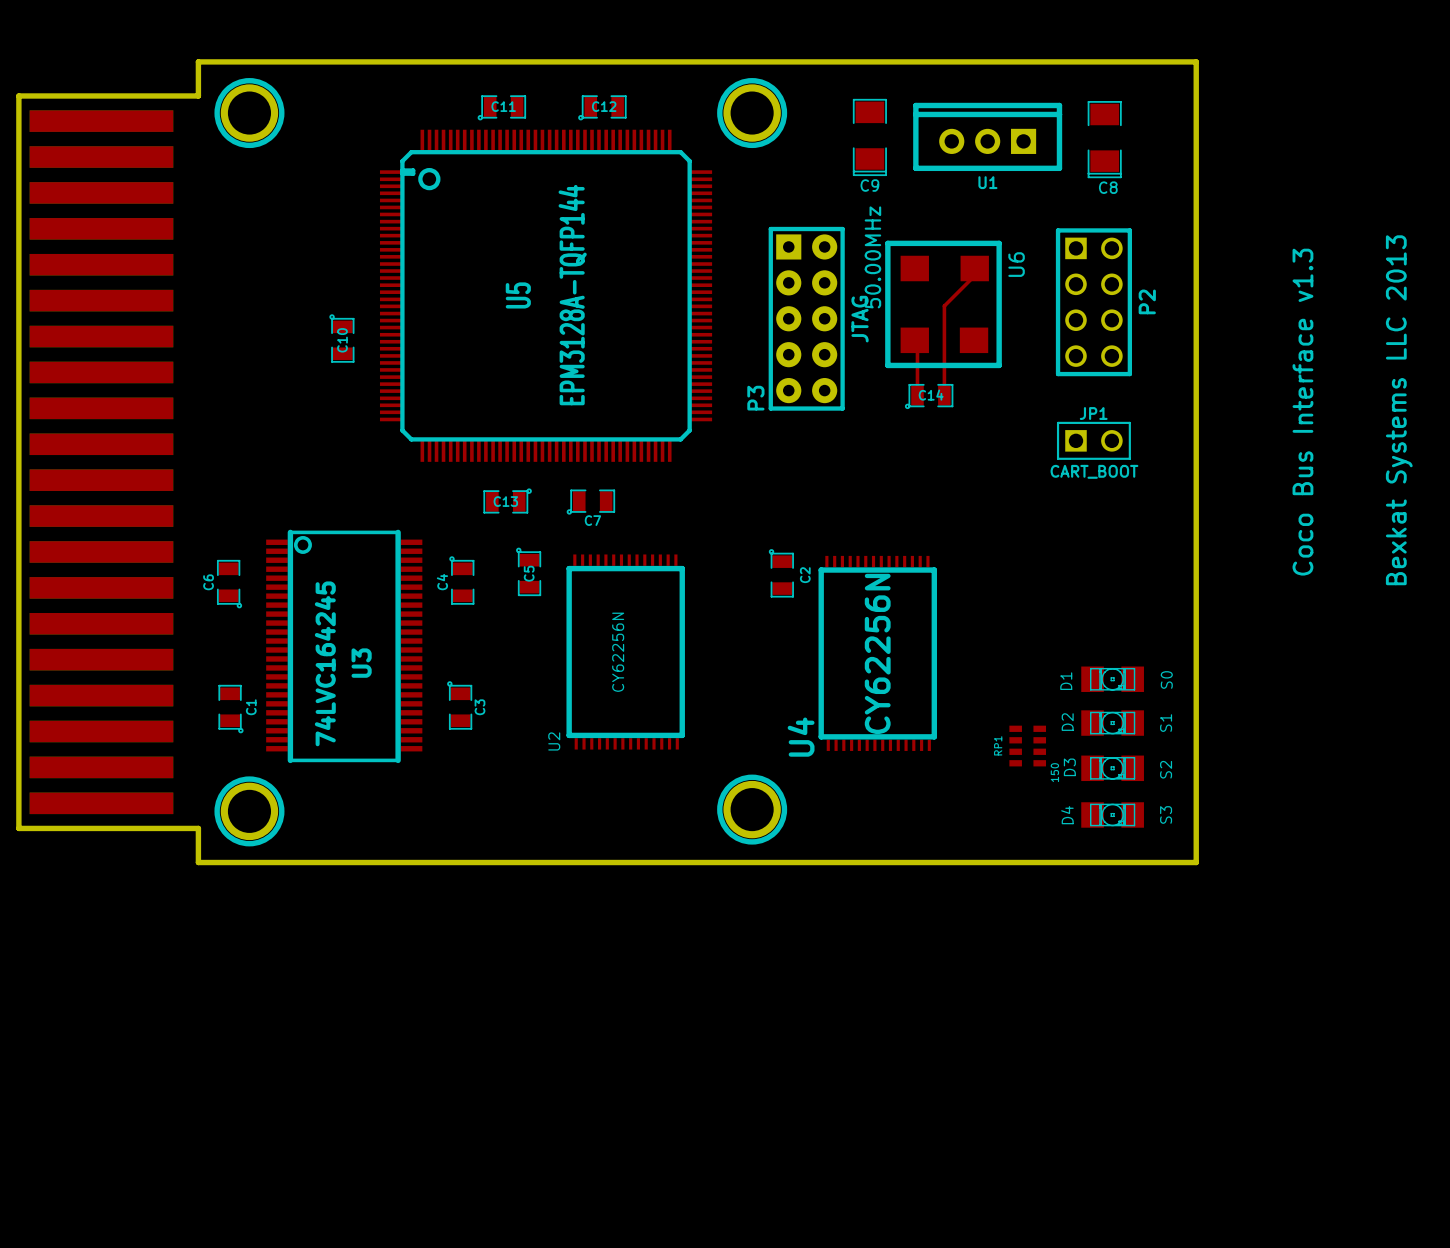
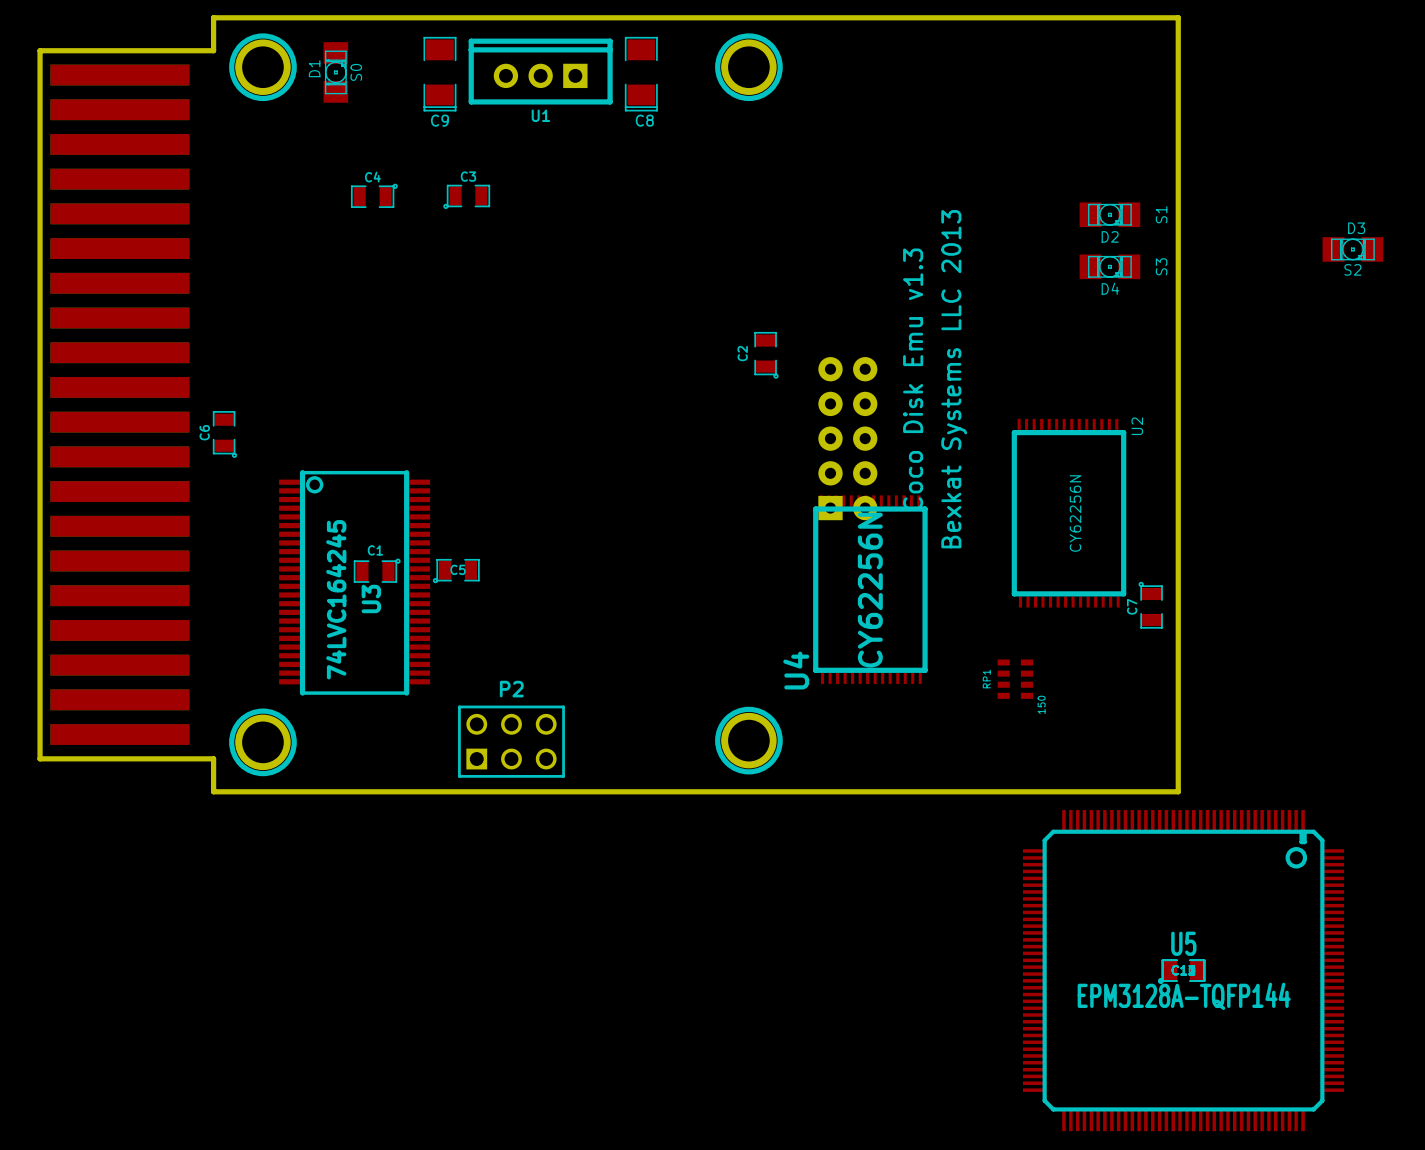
C11 position: (501, 107) -> (1181, 971)
C12 position: (602, 107) -> (1181, 971)
U1 position: (987, 136) -> (540, 71)
C9 position: (869, 137) -> (439, 74)
C8 position: (1104, 139) -> (641, 74)
P2 footprint: [1055, 228, 1133, 377] -> [458, 705, 565, 778]
top track: (974, 268) (974, 275) (944, 306) (944, 395) -> none
U5 rotation: 0° (546, 295) -> 90° clockwise (1183, 970)
U5 position: (546, 295) -> (1183, 970)
P2 name position: P2 (1147, 301) -> P2 (511, 689)
U6: 50.00MHz (943, 304) -> none
P3 side: top (806, 318) -> bottom (847, 438)
C10 rotation: 0° (341, 338) -> 90° counterclockwise (1181, 971)
C10 position: (341, 338) -> (1181, 971)
top track: (914, 340) (917, 343) (917, 395) -> none
C14: (929, 396) -> none
text: Bexkat Systems LLC 2013 (1399, 410) -> none
text: Coco Bus Interface v1.3 (1302, 412) -> none
text: none -> Bexkat Systems LLC 2013 (954, 379)
text: none -> Coco Disk Emu v1.3 (913, 379)
JP1: CART_BOOT (1093, 440) -> none
C13 rotation: 0° (507, 500) -> 180° (1181, 971)
C13 position: (507, 500) -> (1181, 971)
C7 rotation: 0° (590, 502) -> 90° clockwise (1150, 605)
C7 position: (590, 502) -> (1150, 605)
C5 rotation: 0° (528, 571) -> 90° counterclockwise (456, 571)
C5 position: (528, 571) -> (456, 571)
C2 rotation: 0° (781, 573) -> 180° (766, 355)
C2 position: (781, 573) -> (766, 355)
C4 rotation: 0° (461, 580) -> 90° clockwise (374, 195)
C4 position: (461, 580) -> (374, 195)
C6 position: (229, 584) -> (224, 434)
U2 rotation: 0° (625, 652) -> 180° (1068, 513)
U2 position: (625, 652) -> (1068, 513)
D1 rotation: 0° (1112, 679) -> 90° counterclockwise (335, 72)
D1 position: (1112, 679) -> (335, 72)
D1 value position: S0 (1166, 679) -> S0 (356, 72)
C3 rotation: 0° (459, 705) -> 90° counterclockwise (466, 196)
C3 position: (459, 705) -> (466, 196)
C1 rotation: 0° (230, 709) -> 90° counterclockwise (377, 570)
C1 position: (230, 709) -> (377, 570)
D2 name rotation: 0° (1067, 722) -> 90° clockwise (1110, 236)
D2 name position: D2 (1067, 722) -> D2 (1110, 236)
D2 position: (1112, 723) -> (1109, 214)
D3 name rotation: 0° (1069, 767) -> 90° clockwise (1356, 228)
D3 name position: D3 (1069, 767) -> D3 (1356, 228)
D3 position: (1112, 768) -> (1352, 249)
D3 value rotation: 0° (1166, 769) -> 90° clockwise (1352, 269)
D3 value position: S2 (1166, 769) -> S2 (1352, 269)
D4 position: (1112, 814) -> (1109, 266)
D4 name rotation: 0° (1067, 815) -> 90° clockwise (1110, 288)
D4 name position: D4 (1067, 815) -> D4 (1110, 288)

